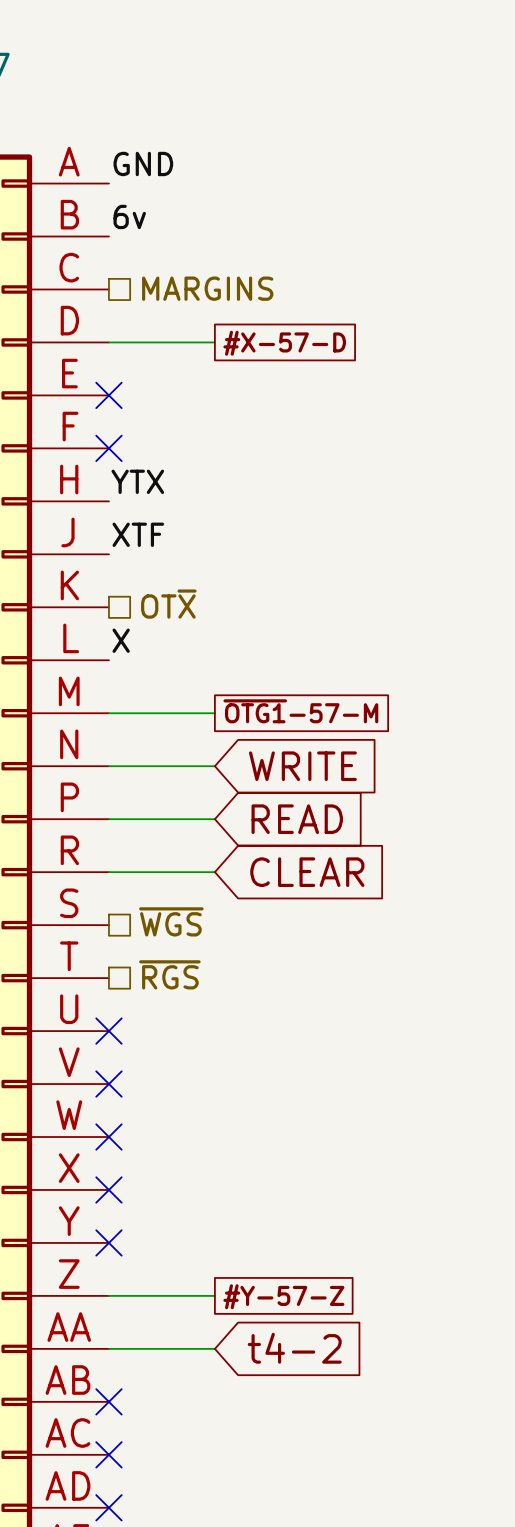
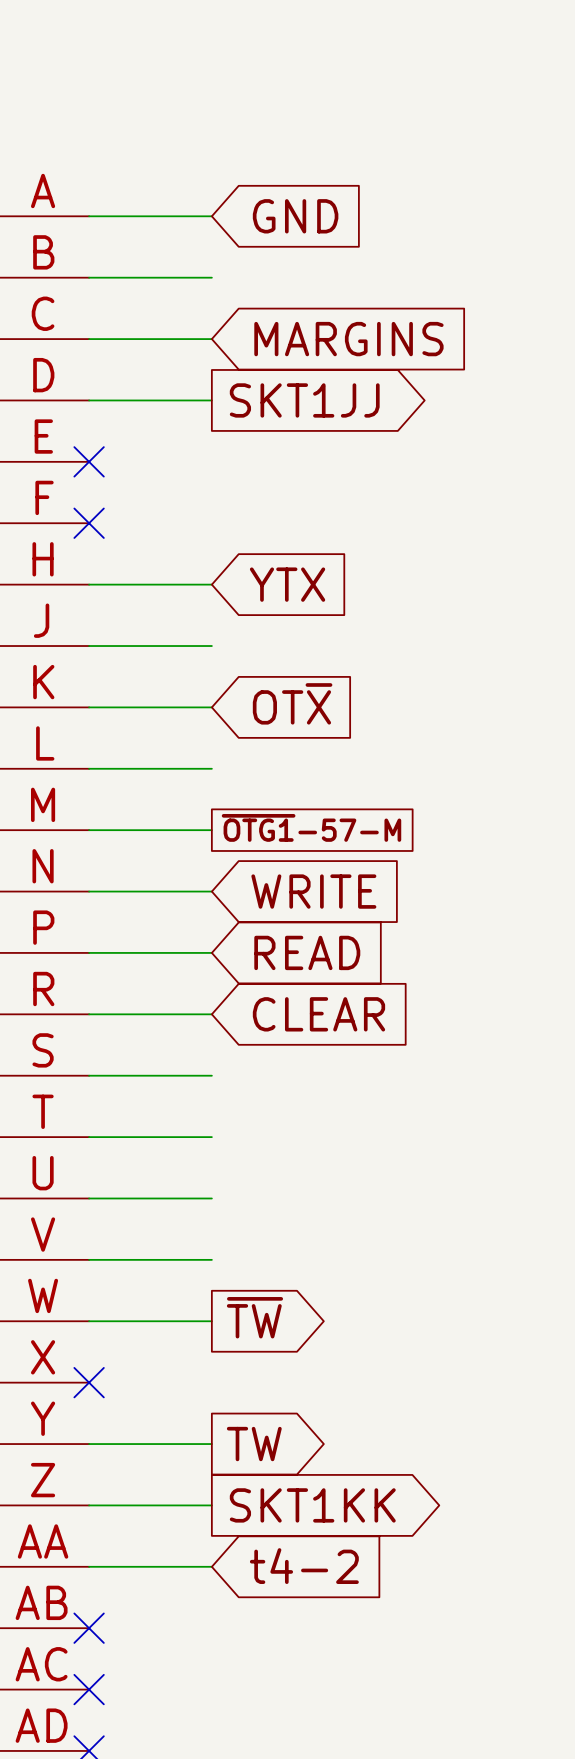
label: GND (143, 163) -> none
wire: none -> (89, 216) (211, 216)
global label: none -> GND (295, 216)
label: 6v (129, 216) -> none
wire: none -> (89, 277) (211, 277)
hierarchical label: MARGINS (207, 288) -> none
wire: none -> (89, 339) (211, 339)
global label: none -> MARGINS (348, 339)
global label shape: passive (284, 343) -> output (304, 400)
global label: #X-57-D (284, 343) -> SKT1JJ (304, 400)
label: YTX (137, 481) -> none
wire: none -> (89, 584) (211, 584)
global label: none -> YTX (287, 584)
label: XTF (138, 534) -> none
wire: none -> (89, 646) (211, 646)
hierarchical label: OT~{X} (168, 604) -> none
global label: none -> OT~{X} (292, 703)
wire: none -> (89, 707) (211, 707)
label: X (121, 640) -> none
wire: none -> (89, 768) (211, 768)
hierarchical label: ~{WGS} (171, 921) -> none
wire: none -> (89, 1075) (211, 1075)
hierarchical label: ~{RGS} (169, 974) -> none
wire: none -> (89, 1137) (211, 1137)
wire: none -> (89, 1198) (211, 1198)
no-connect mark: (108, 1031) -> none
wire: none -> (89, 1259) (211, 1259)
no-connect mark: (108, 1084) -> none
global label: none -> ~{TW} (254, 1317)
wire: none -> (89, 1321) (211, 1321)
no-connect mark: (108, 1137) -> none
wire: none -> (89, 1444) (211, 1444)
no-connect mark: (108, 1242) -> none
global label: none -> TW (254, 1444)
global label shape: passive (283, 1296) -> output (312, 1505)
global label: #Y-57-Z (283, 1296) -> SKT1KK (312, 1505)

